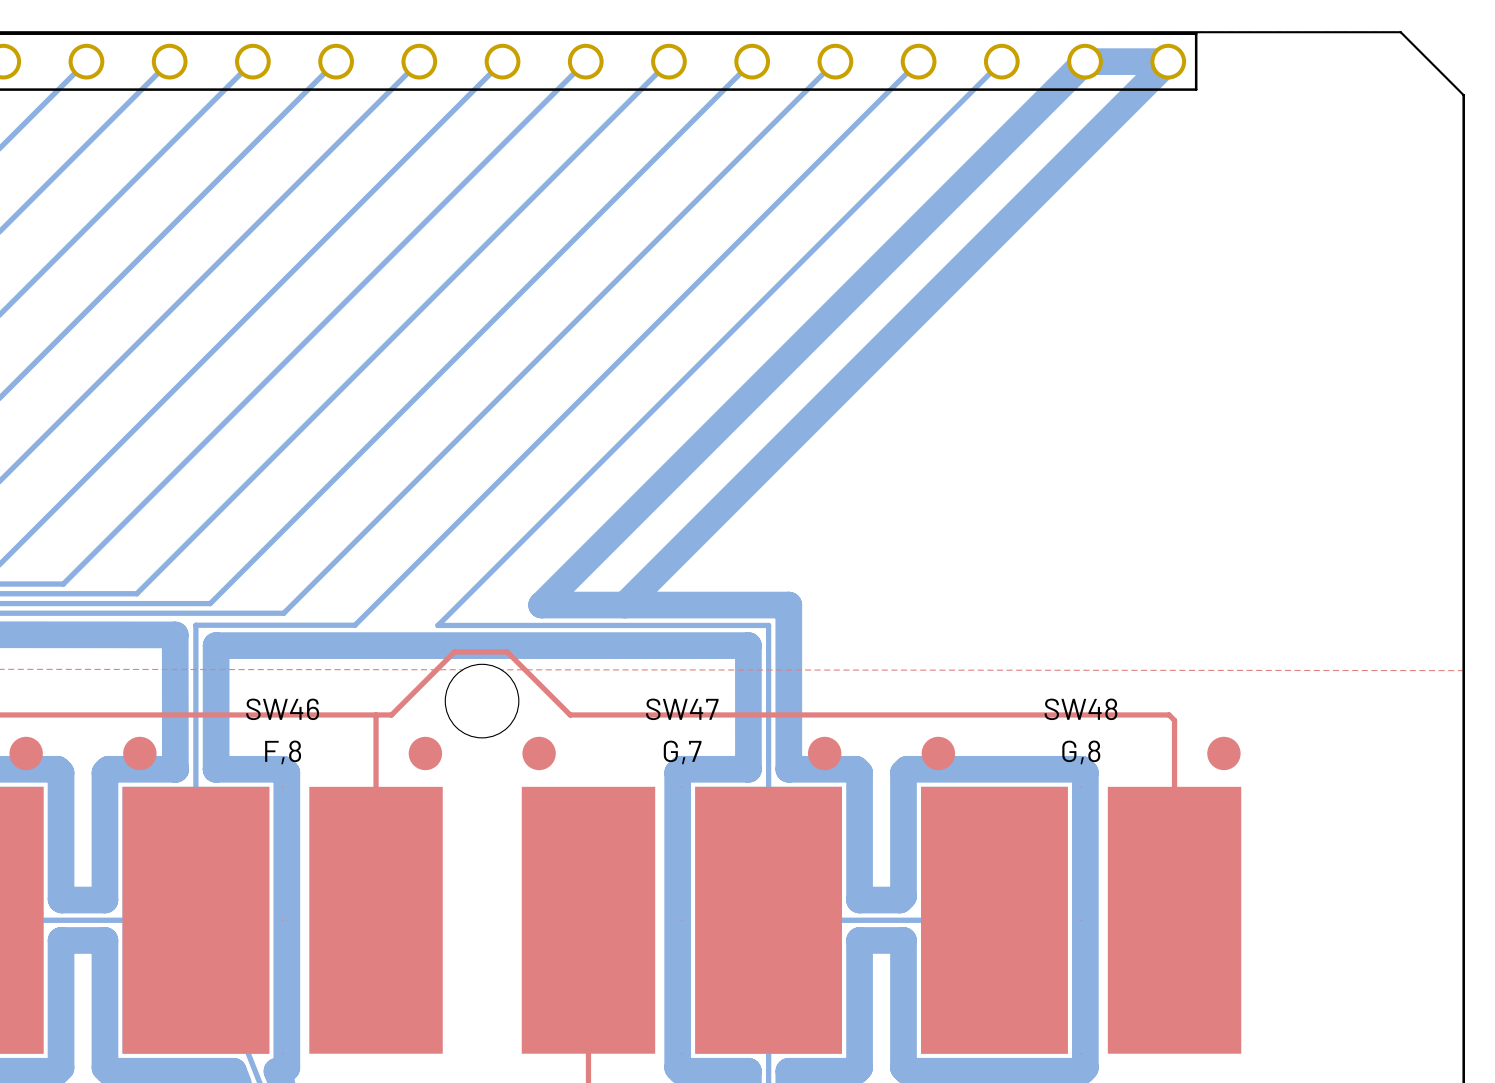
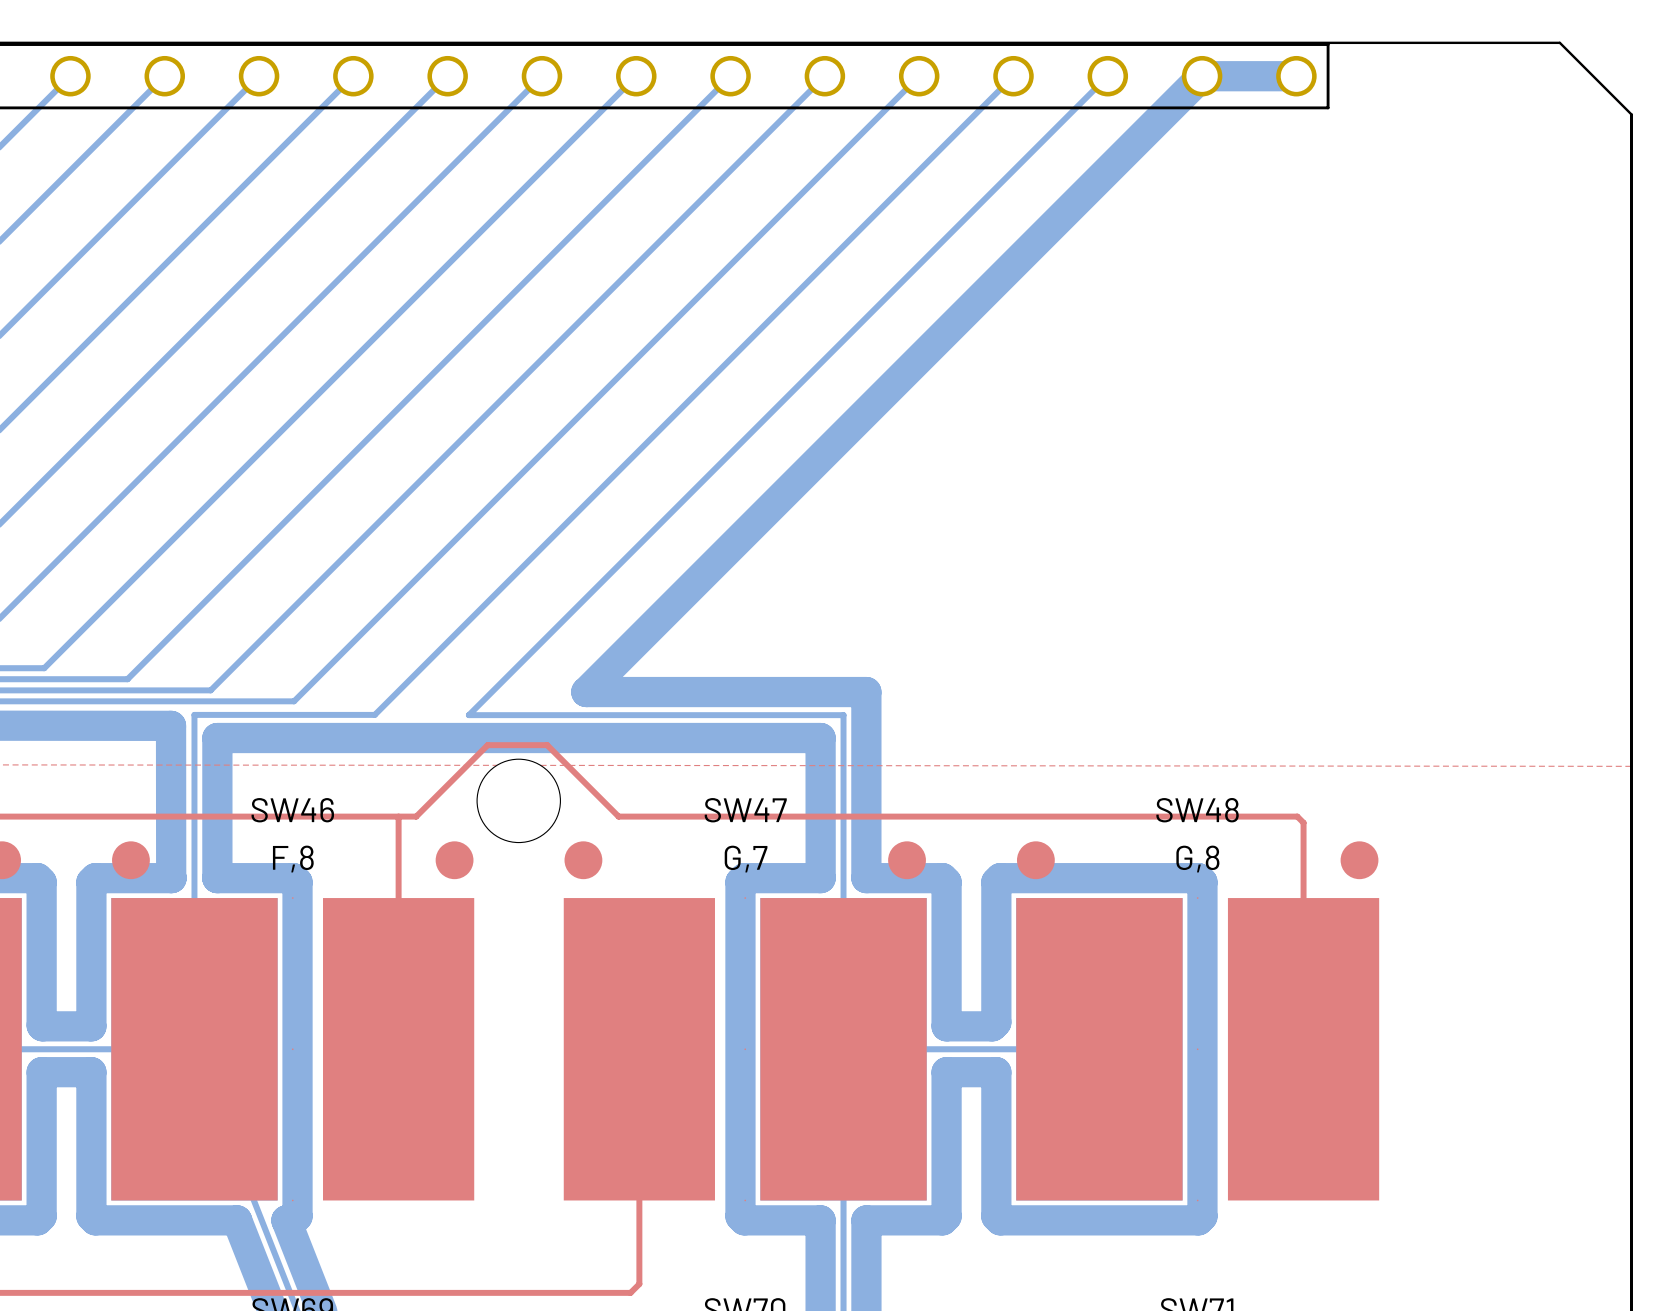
bottom track: (1168, 61) (624, 605) -> none

